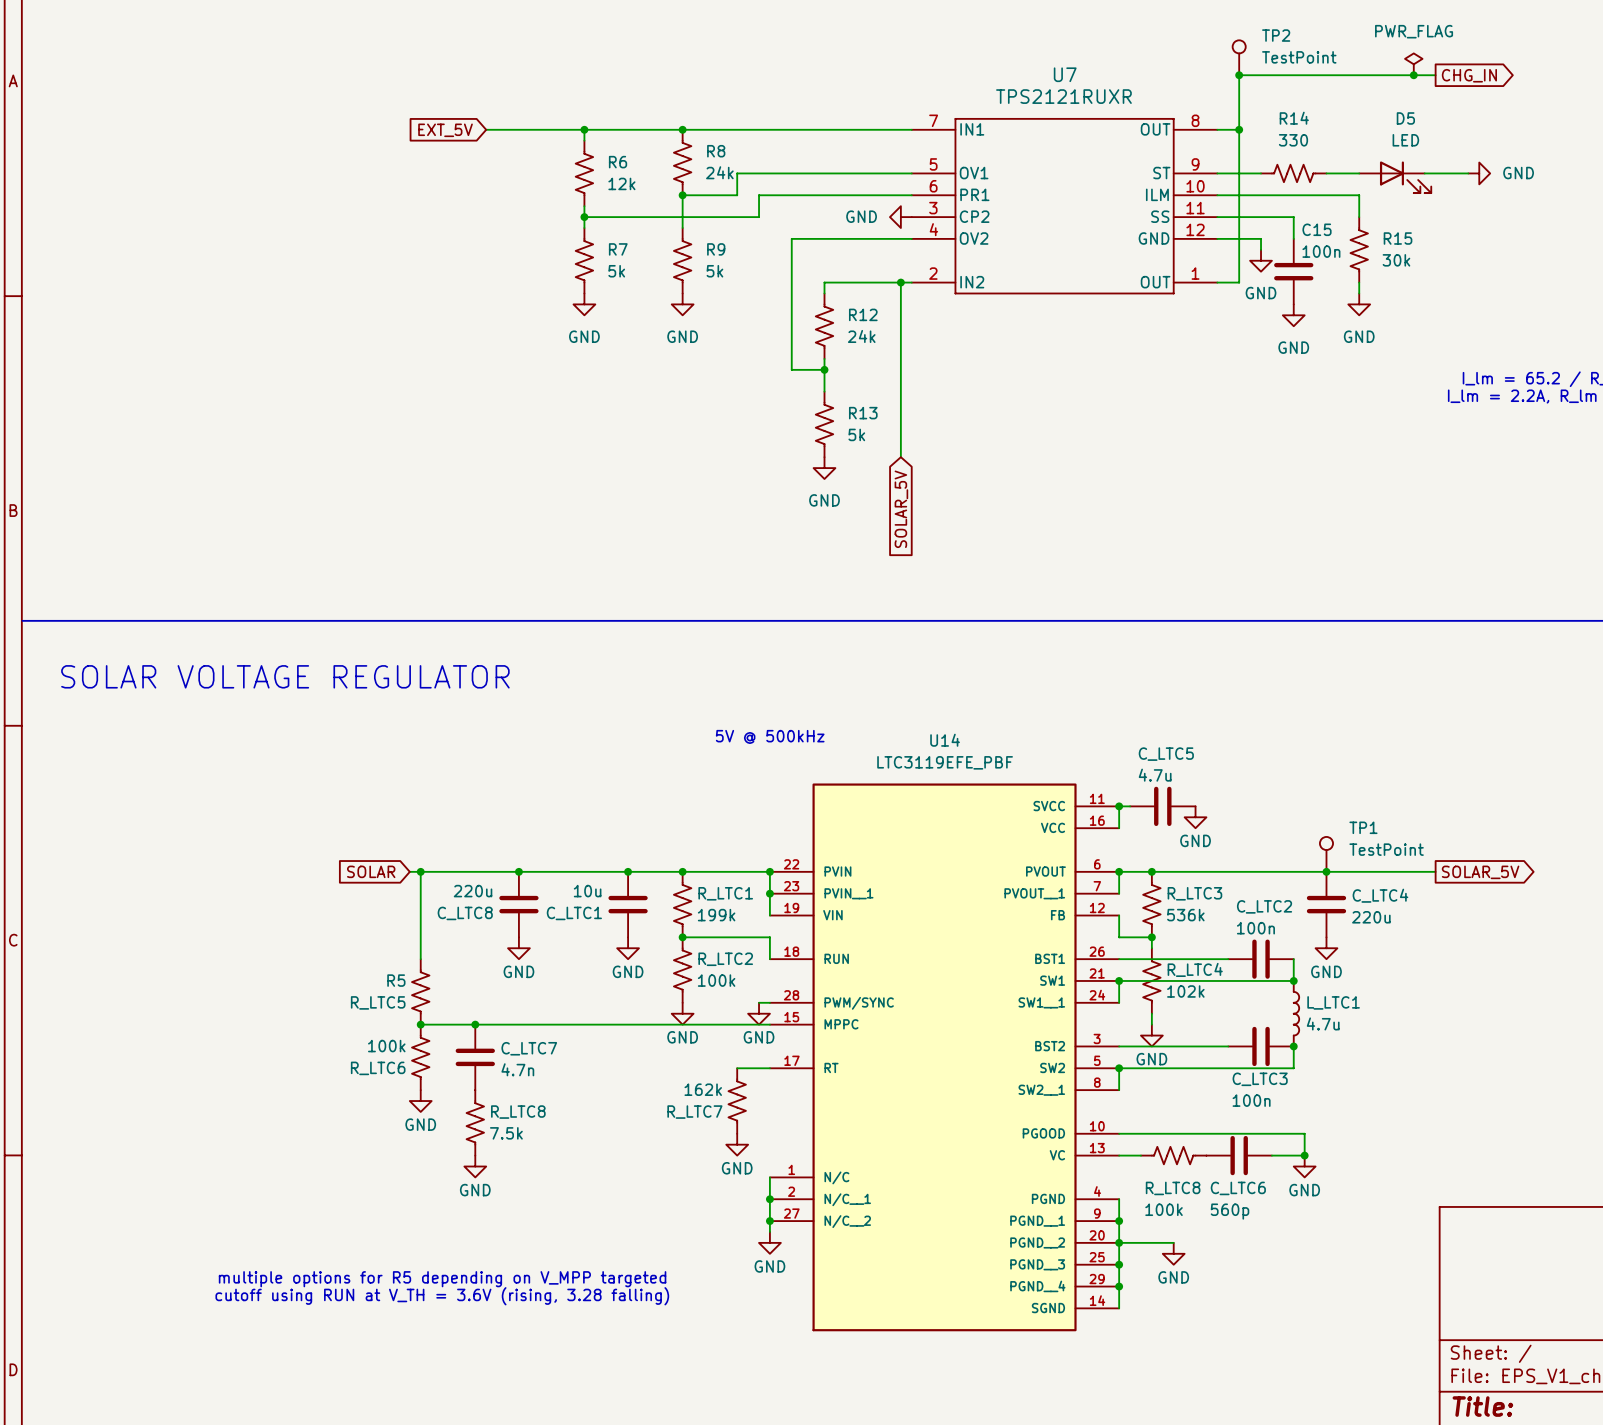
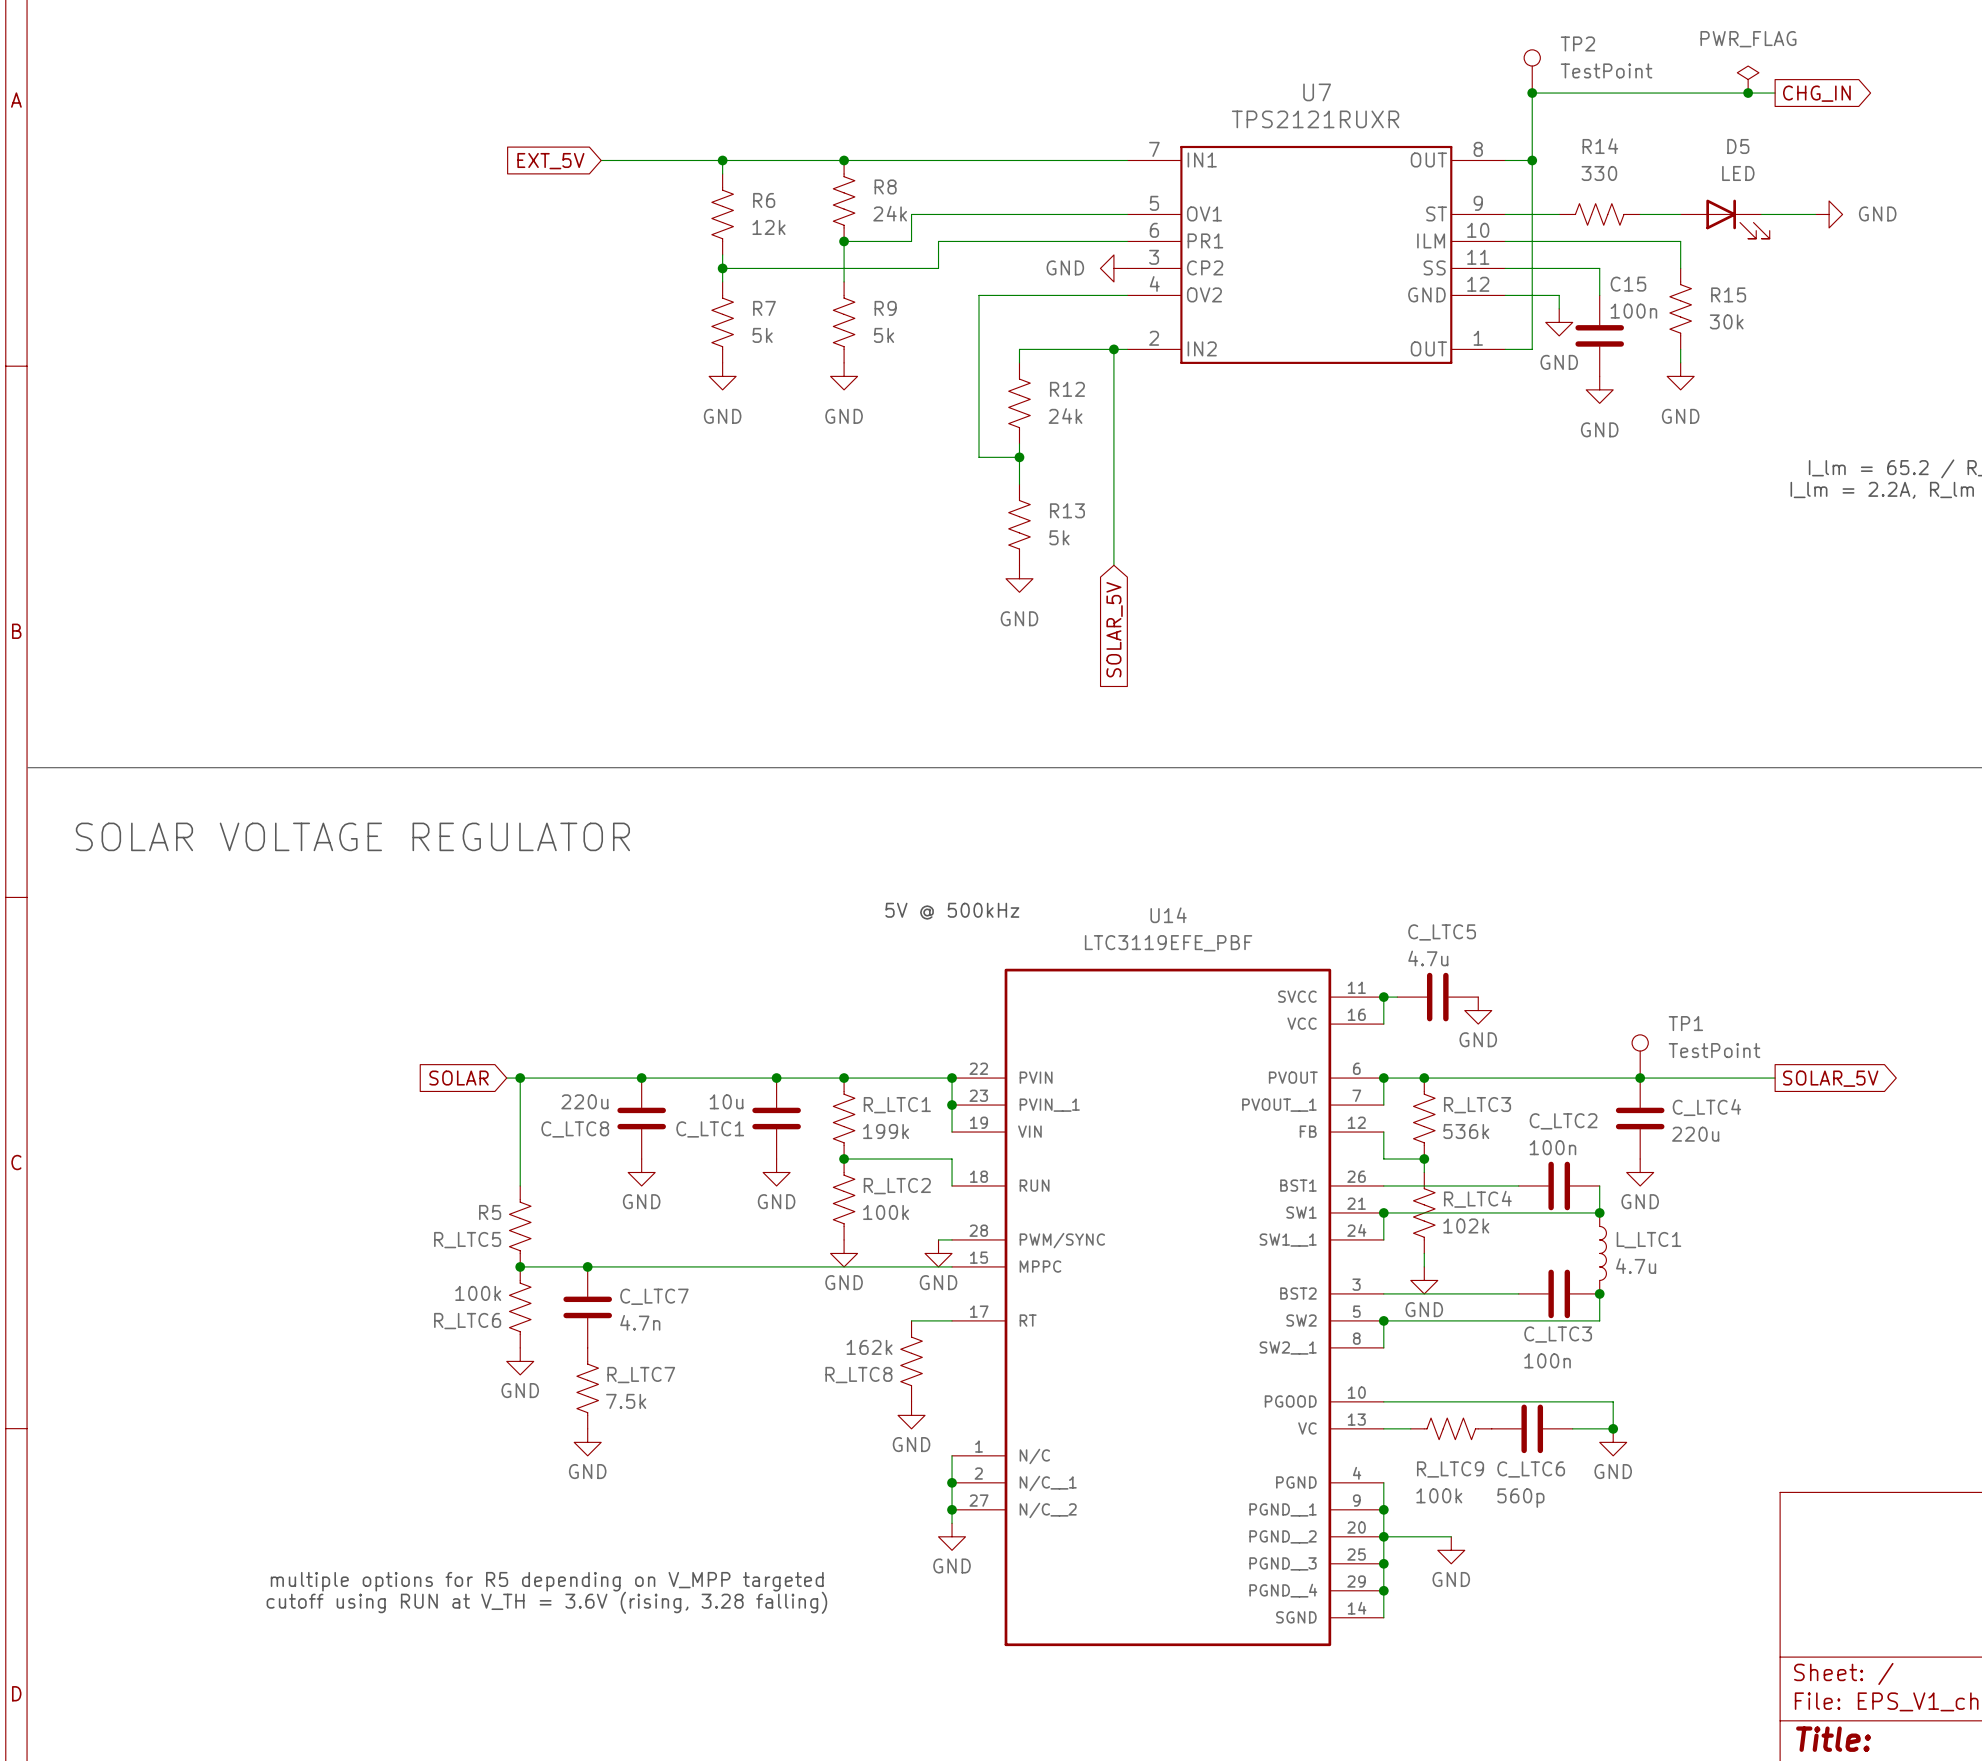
R_LTC8 name: R_LTC8 (518, 1112) -> R_LTC7 (641, 1375)
R_LTC7 name: R_LTC7 (694, 1112) -> R_LTC8 (858, 1375)
R_LTC8 name: R_LTC8 (1173, 1188) -> R_LTC9 (1450, 1469)

